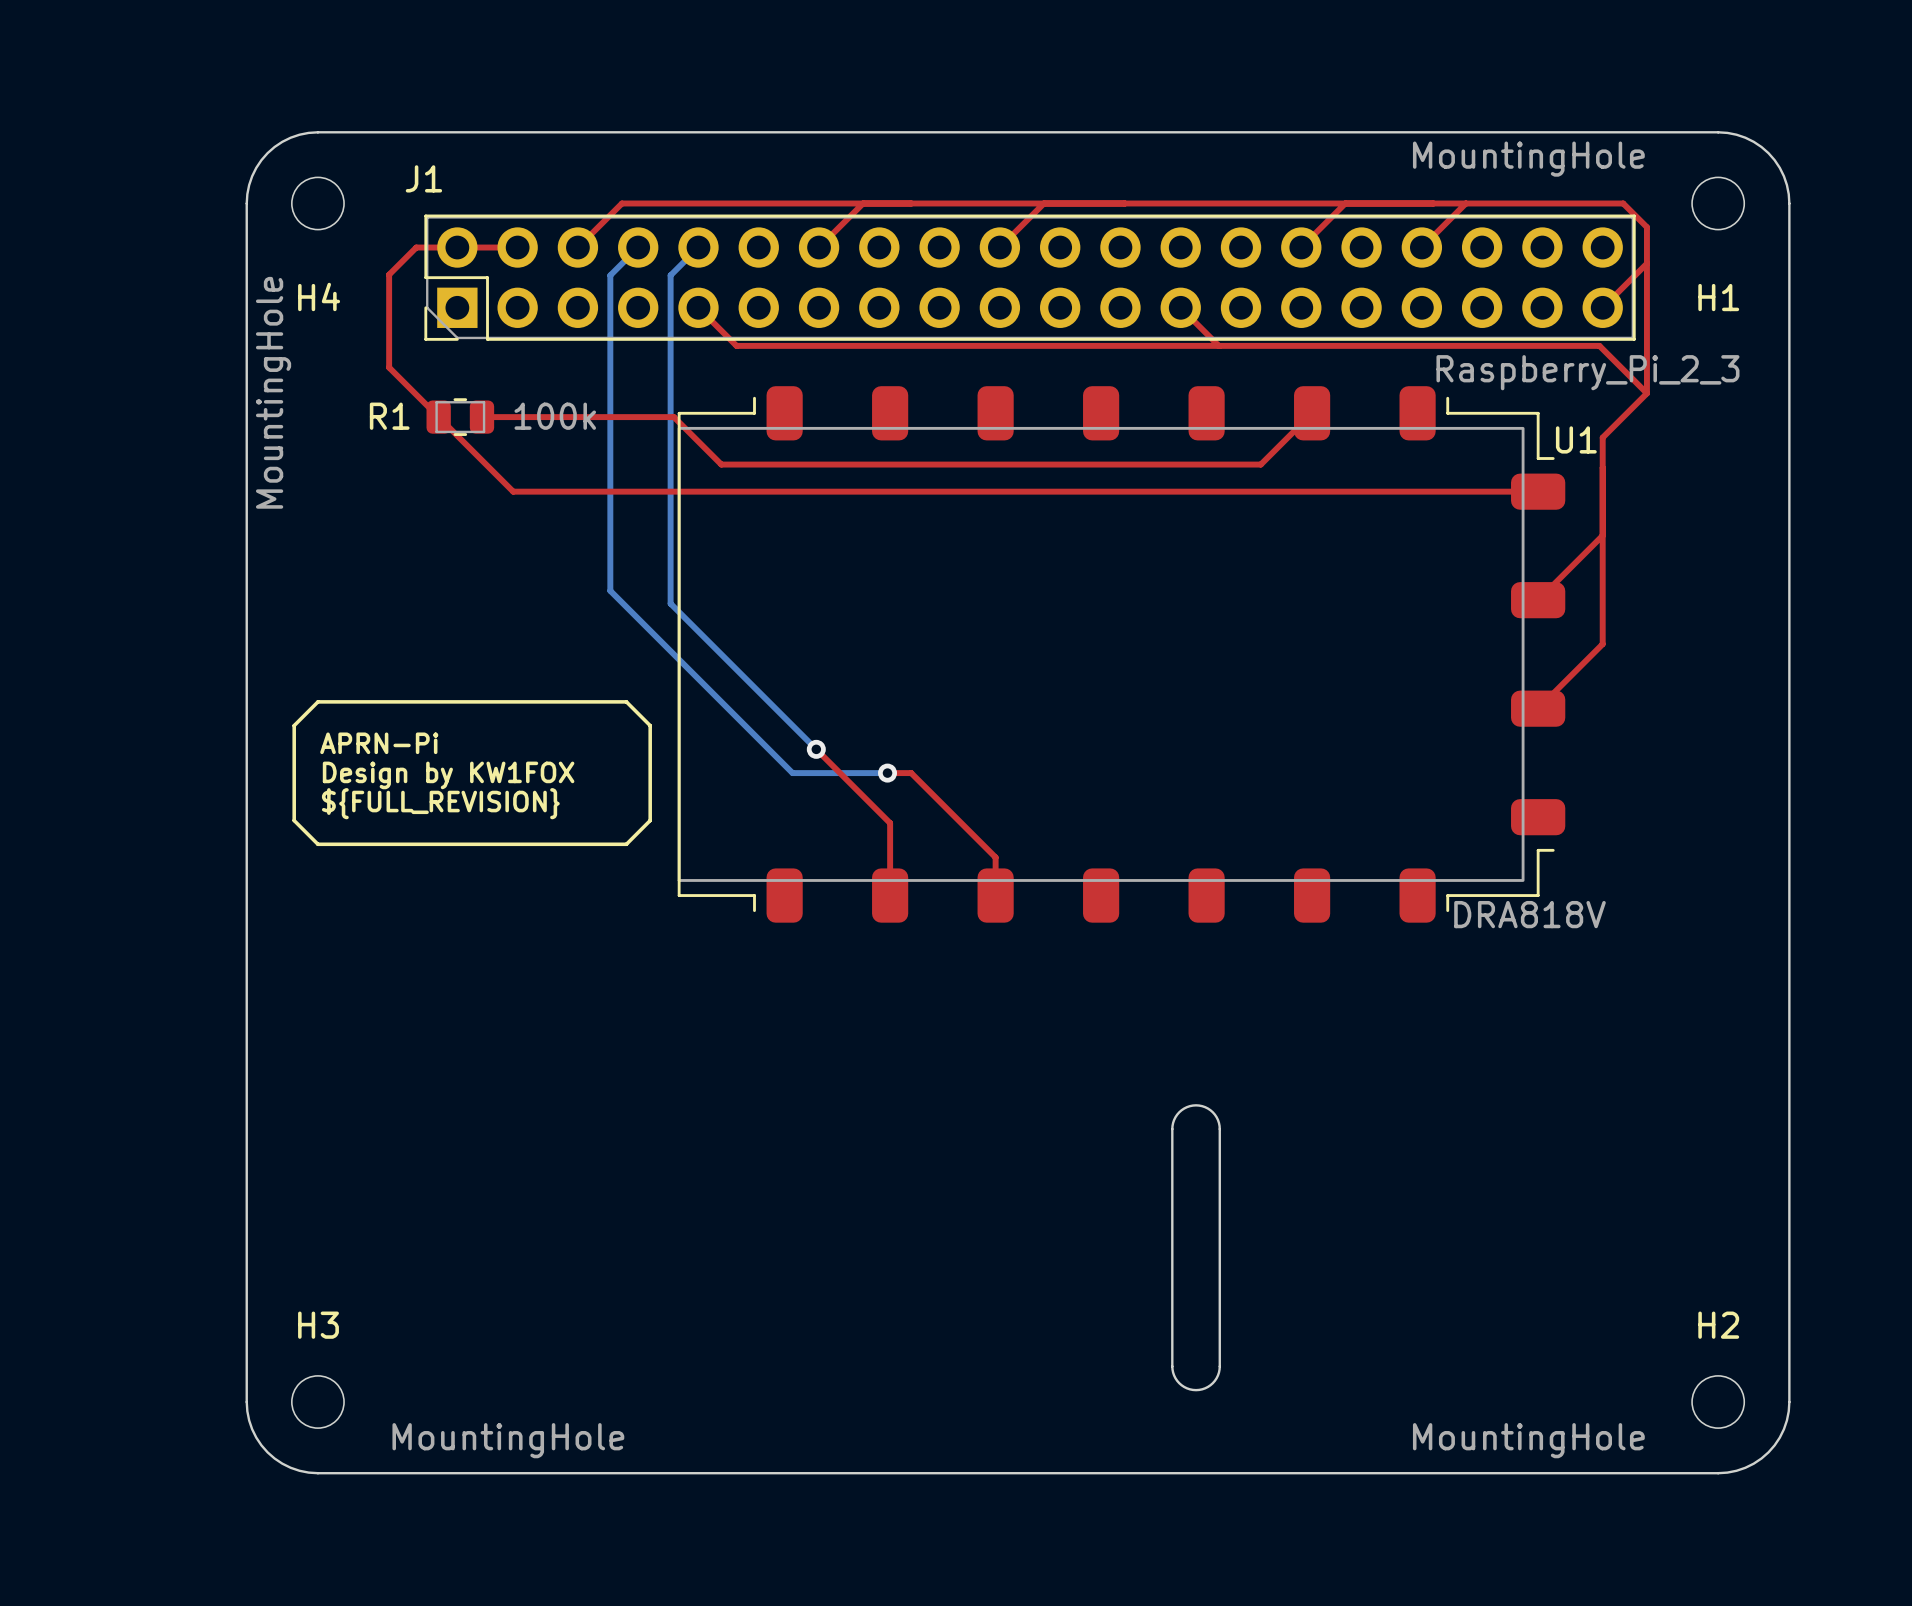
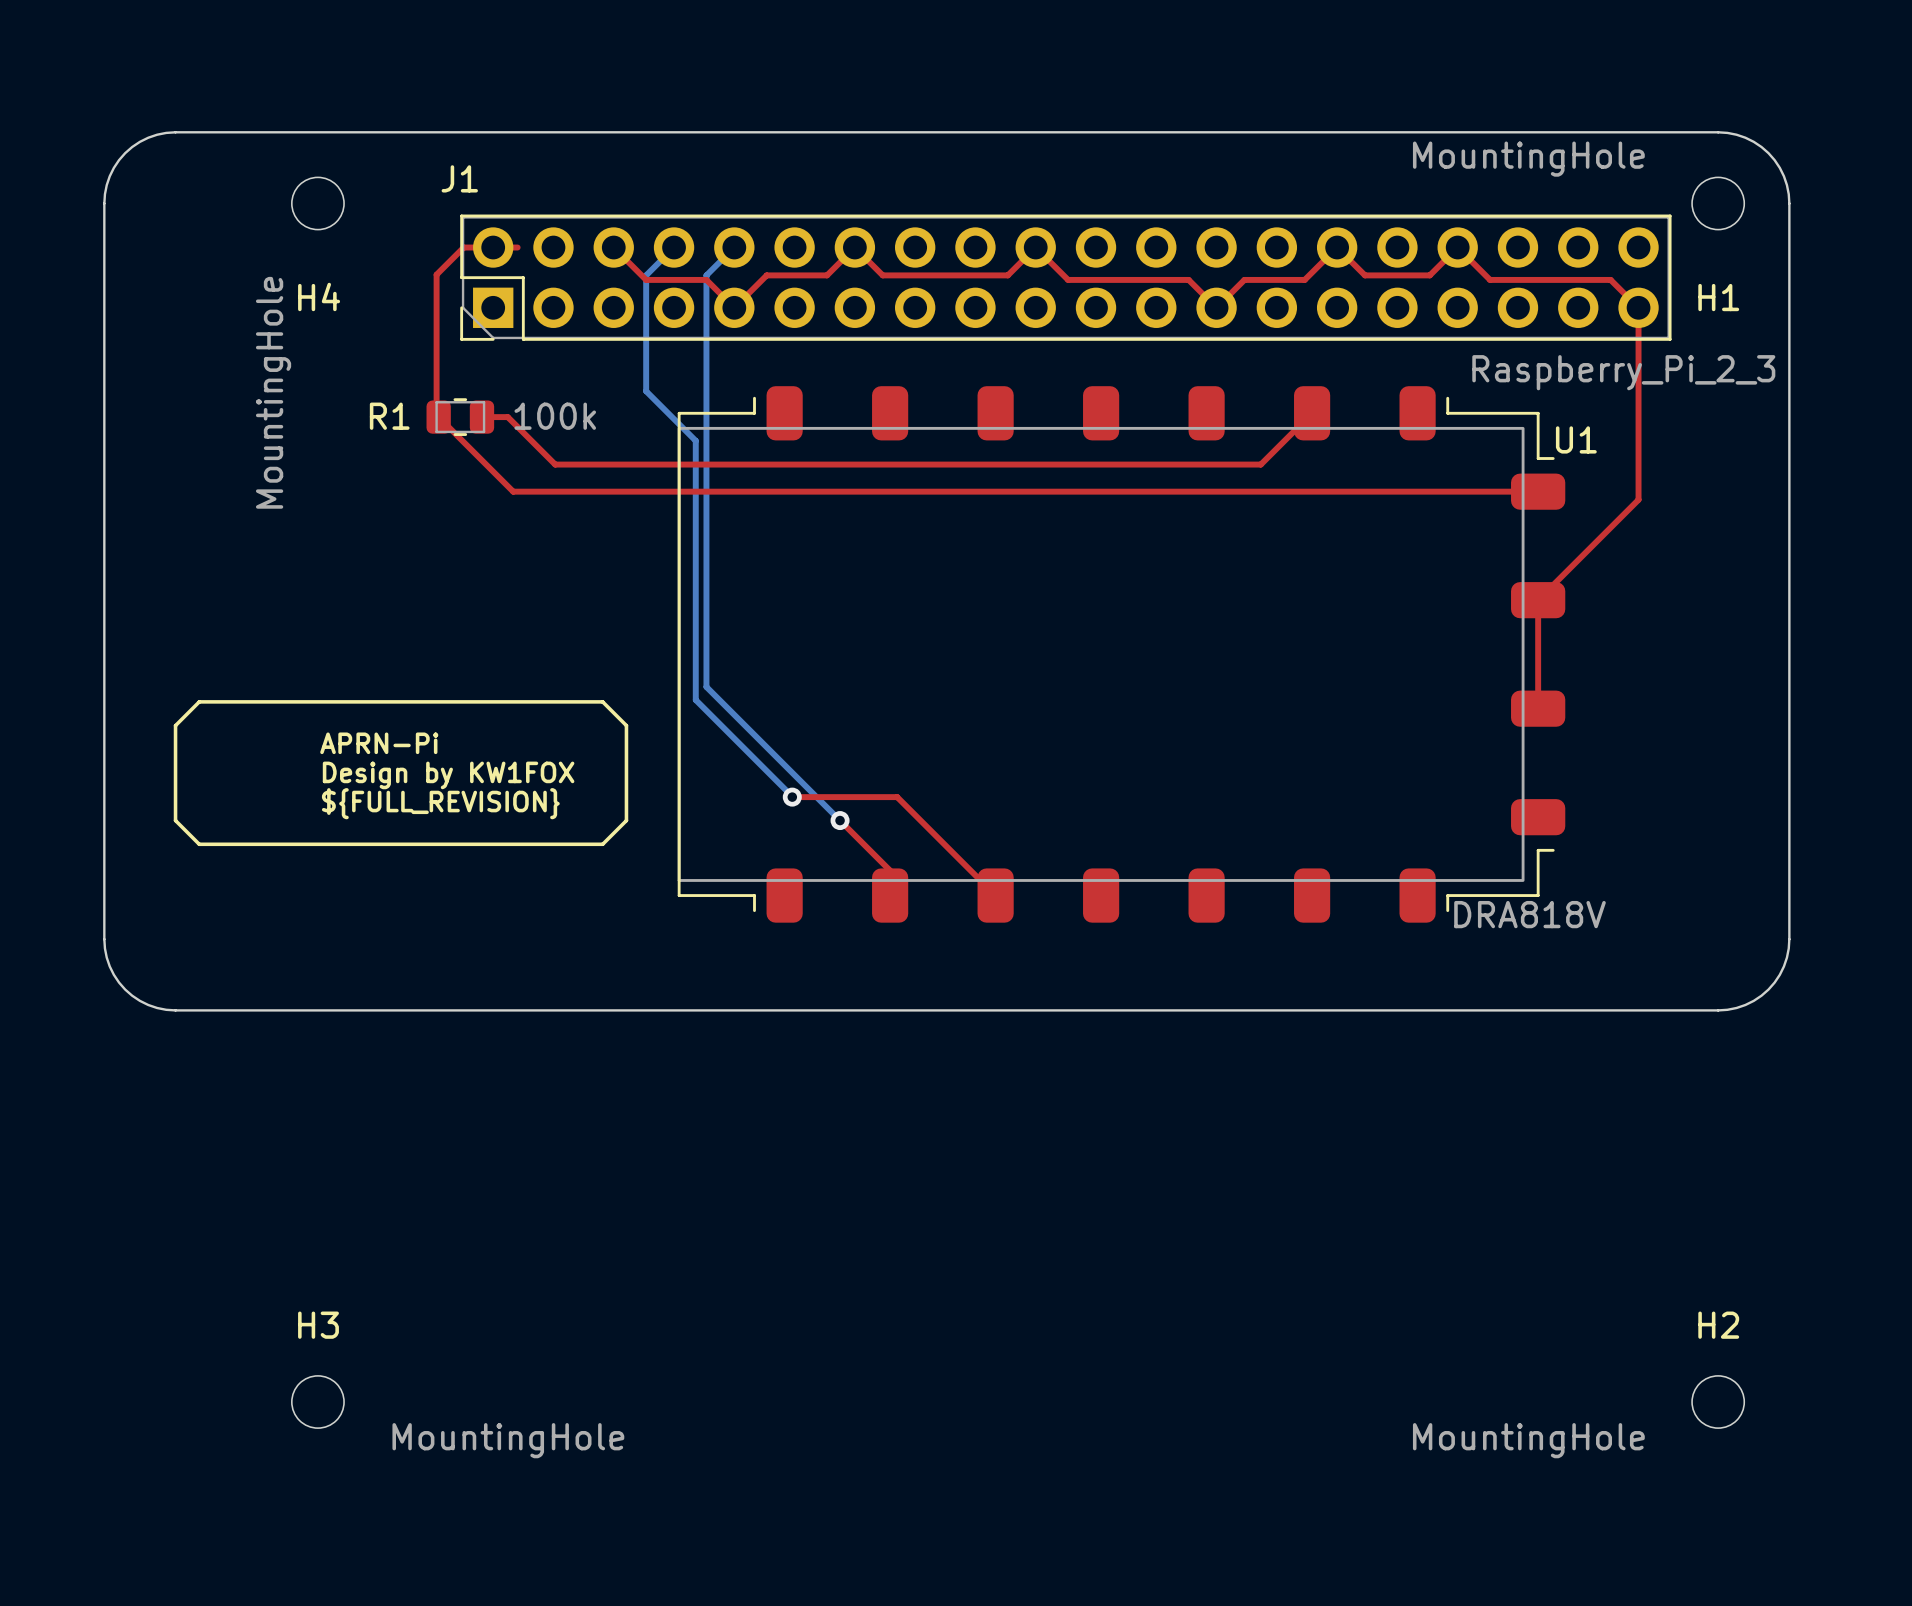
board edge: (317, 132) (290, 137) (267, 153) (252, 176) (246, 203) (246, 1402) (249, 1420) (256, 1437) (267, 1452) (282, 1463) (299, 1470) (317, 1473) (1718, 1473) (1745, 1467) (1761, 1458) (1774, 1445) (1783, 1429) (1788, 1411) (1789, 939) -> (317, 132) (175, 132) (157, 134) (139, 141) (125, 153) (113, 167) (106, 185) (104, 203) (104, 939) (106, 957) (113, 974) (125, 989) (139, 1000) (157, 1007) (175, 1010) (1718, 1010) (1745, 1004) (1768, 989) (1783, 966) (1789, 939)
top track: (863, 203) (819, 247) -> none
top track: (1043, 203) (999, 247) -> none
top track: (1345, 203) (1301, 247) -> none
top track: (1465, 203) (1421, 247) -> none
top track: (463, 247) (416, 247) (389, 274) (389, 367) (436, 415) -> (463, 247) (436, 274) (436, 415)
top track: (577, 247) (621, 203) (1623, 203) (1646, 227) (1646, 393) -> none
top track: none -> (613, 247) (646, 279) (706, 279) (734, 307) (766, 275) (827, 275) (854, 247) (882, 275) (1007, 275) (1035, 247) (1068, 279) (1188, 279) (1216, 307) (1244, 279) (1304, 279) (1337, 247) (1365, 275) (1429, 275) (1457, 247) (1490, 279) (1610, 279) (1638, 307) (1638, 499) (1602, 535)
bottom track: (638, 247) (610, 275) (610, 590) (706, 686) -> (734, 247) (706, 275) (706, 686)
bottom track: none -> (674, 247) (646, 275) (646, 391) (695, 440) (695, 700) (792, 797)
bottom track: (698, 247) (670, 275) (670, 603) (816, 749) -> none
top track: (1646, 263) (1602, 307) -> none
J1 position: (1030, 277) -> (1065, 277)
top track: (698, 307) (736, 345) (1599, 345) (1646, 393) -> none
top track: (1180, 307) (1218, 345) -> none
top track: (1646, 393) (1602, 437) (1602, 644) (1538, 708) -> (1538, 600) (1538, 708)
top track: (507, 417) (673, 417) (721, 464) -> (507, 417) (555, 464) (721, 464)
line: (317, 701) (294, 725) (294, 820) (317, 844) -> (317, 701) (199, 701) (175, 725) (175, 820) (199, 844) (317, 844)
line: (602, 701) (626, 701) (650, 725) (650, 820) (626, 844) (602, 844) -> (602, 701) (626, 725) (626, 820) (602, 844)
top track: (816, 749) (890, 823) (890, 870) -> (840, 820) (890, 870)
via: (816, 749) -> none
bottom track: (792, 773) (887, 773) -> (792, 773) (840, 820)
top track: (887, 773) (911, 773) (995, 857) (995, 895) -> (792, 797) (897, 797) (995, 895)
via: (887, 773) -> none
via: none -> (792, 797)
via: none -> (840, 820)
board edge: (1172, 1129) (1172, 1369) (1175, 1378) (1181, 1385) (1189, 1389) (1199, 1389) (1212, 1383) (1219, 1369) (1219, 1125) (1212, 1112) (1205, 1107) (1196, 1105) (1186, 1107) (1179, 1112) (1174, 1119) (1172, 1129) -> none

